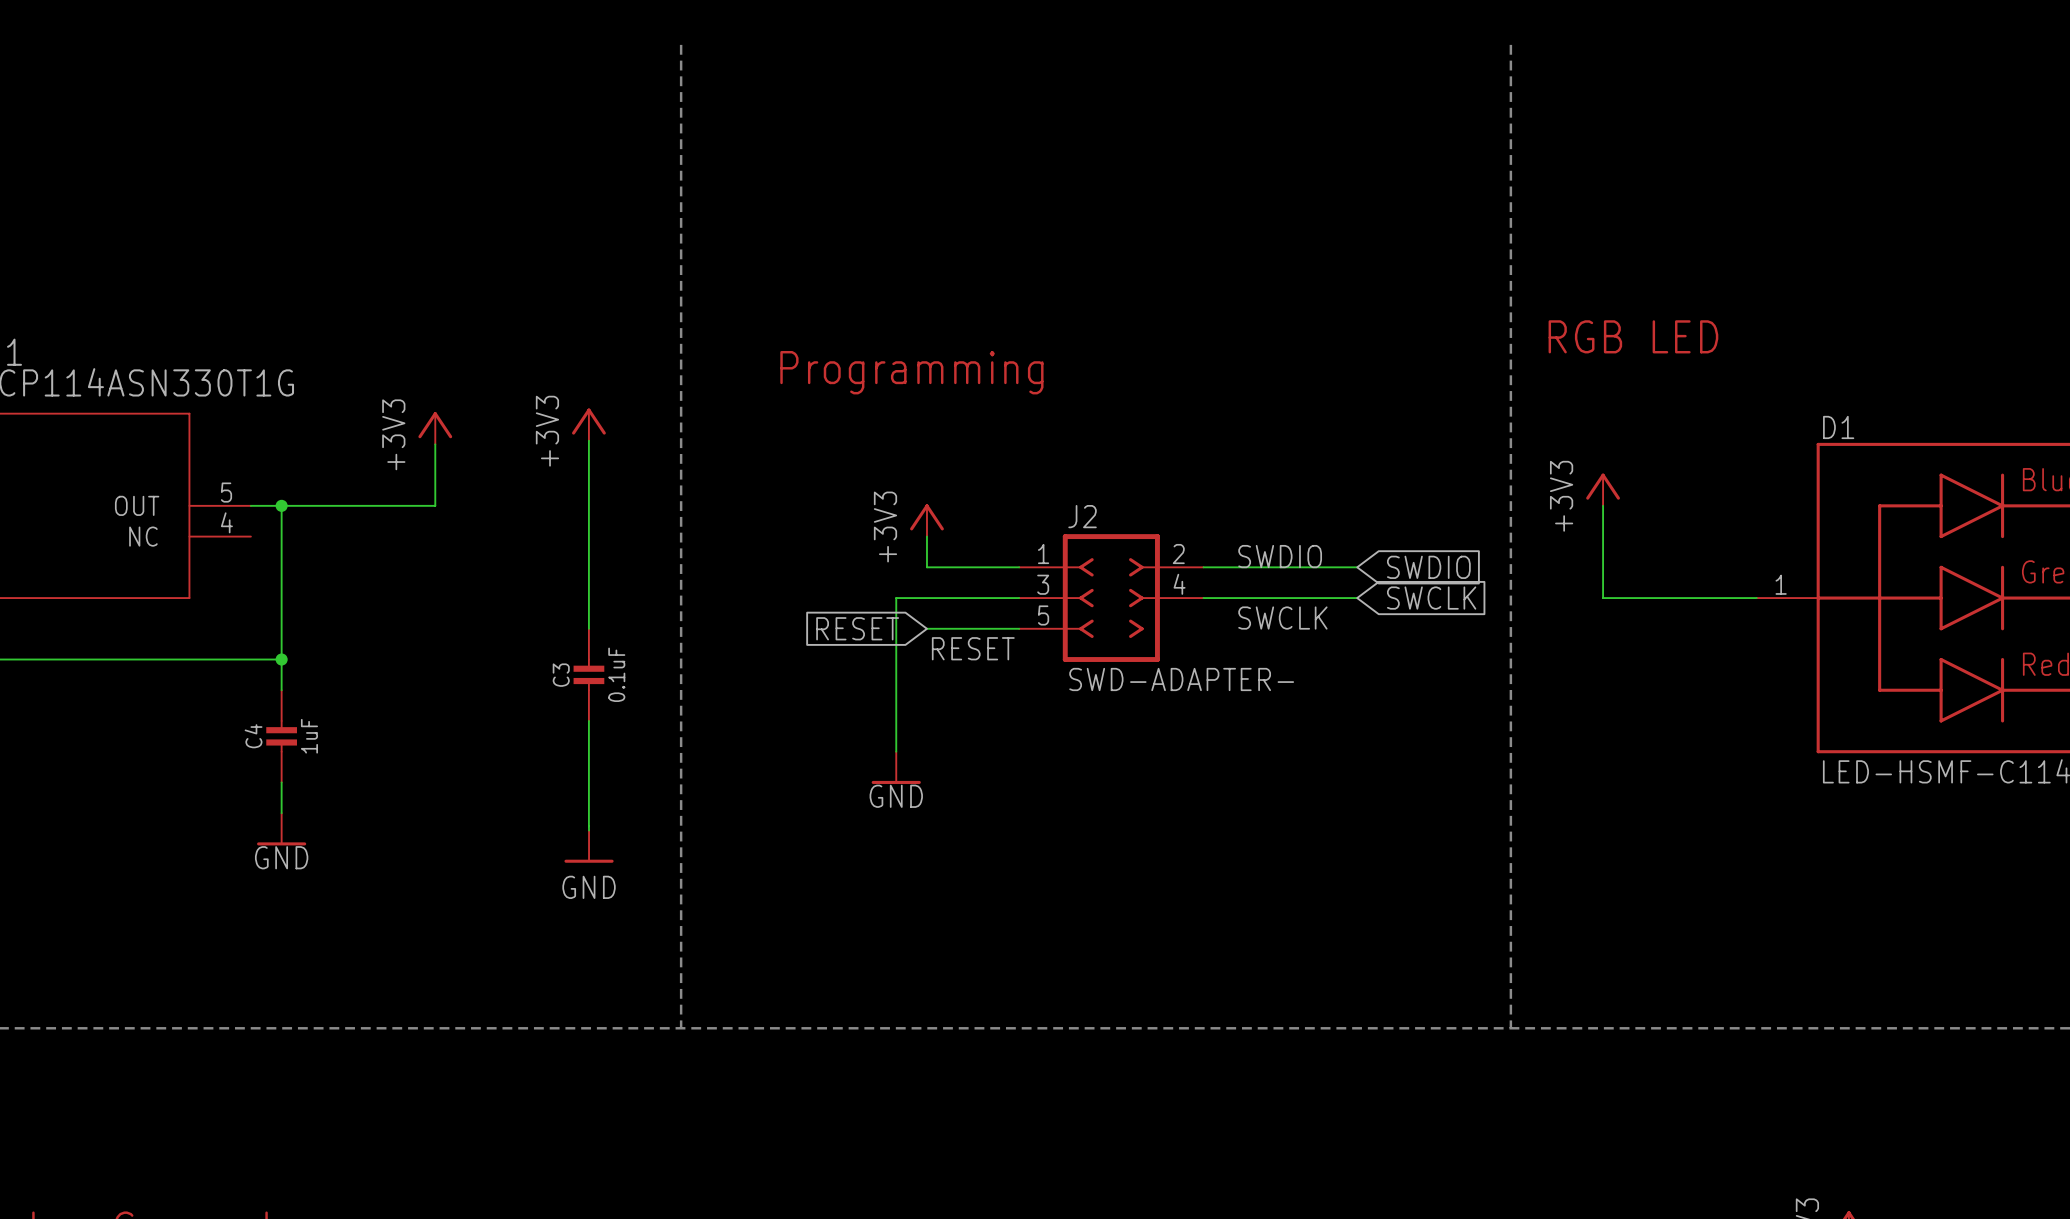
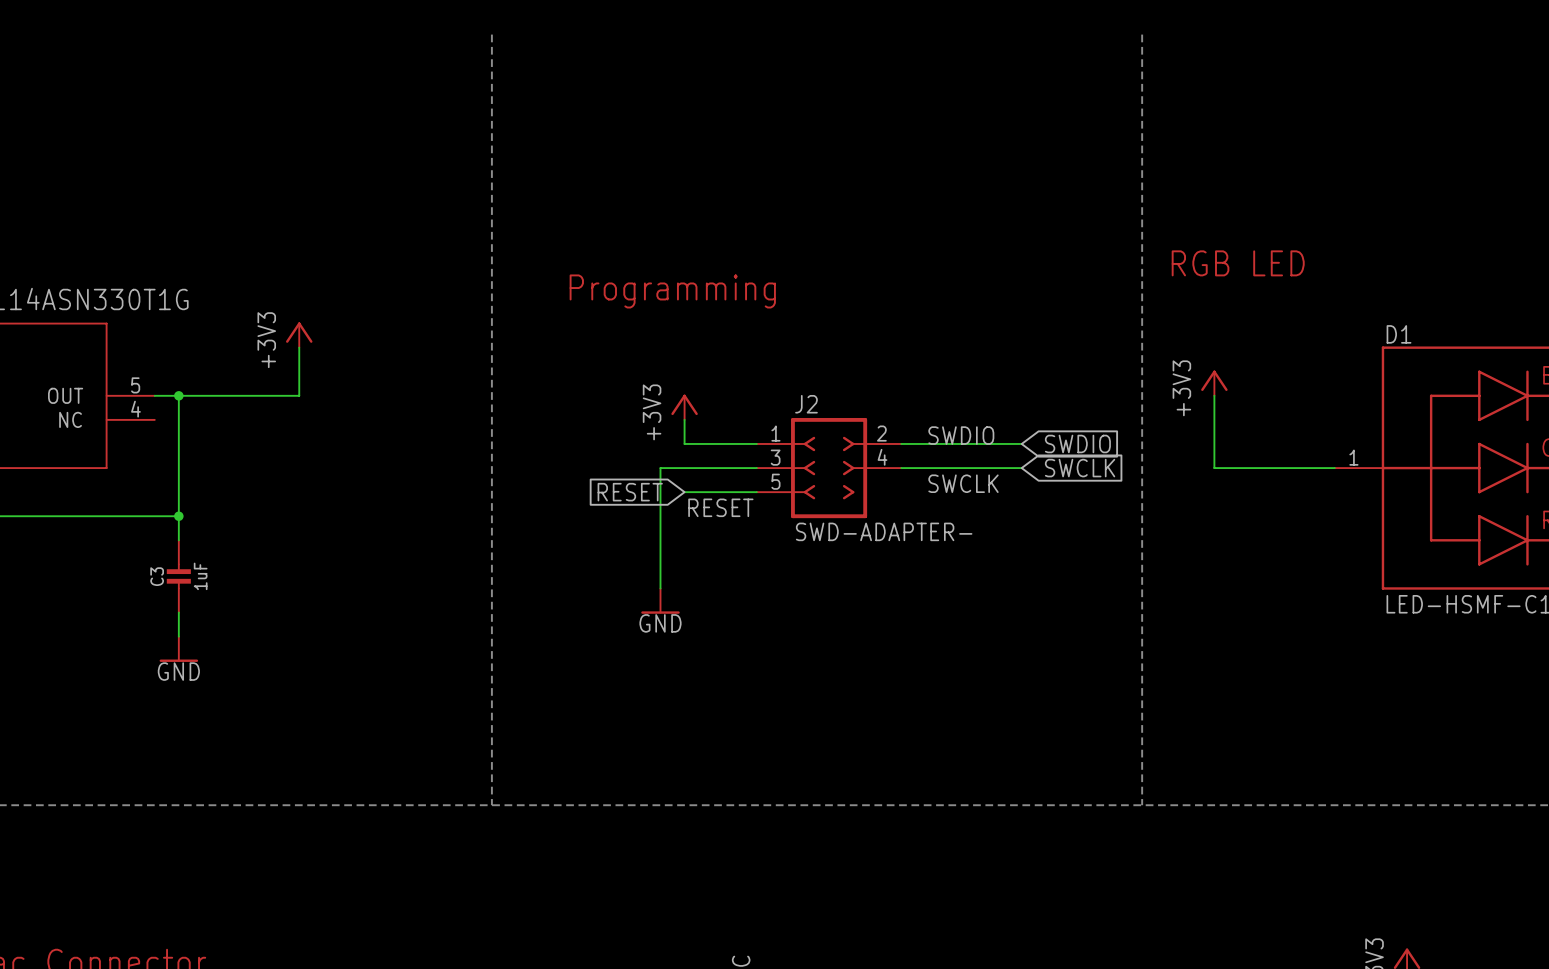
power symbol: +3V3 (588, 424) -> none
wire: (588, 440) (588, 628) -> none
C3: 0.1uF (588, 674) -> none
wire: (588, 720) (589, 830) -> none
C4 name: C4 (253, 736) -> C3 (157, 576)
power symbol: GND (589, 846) -> none

